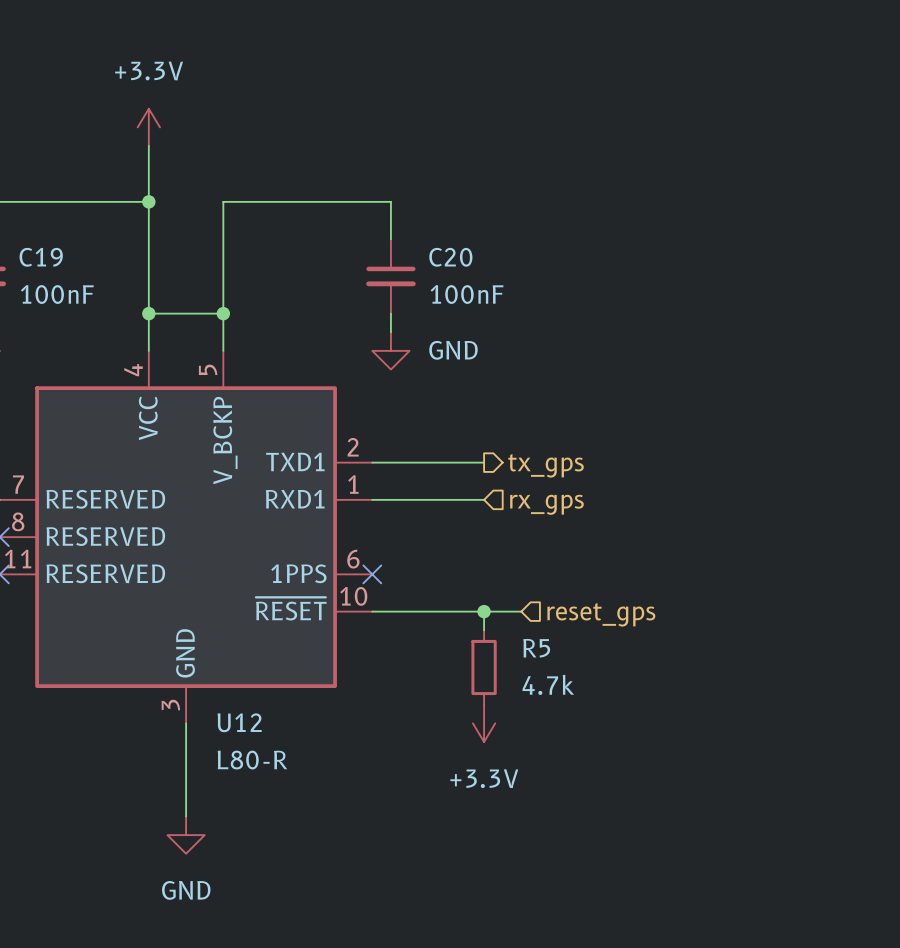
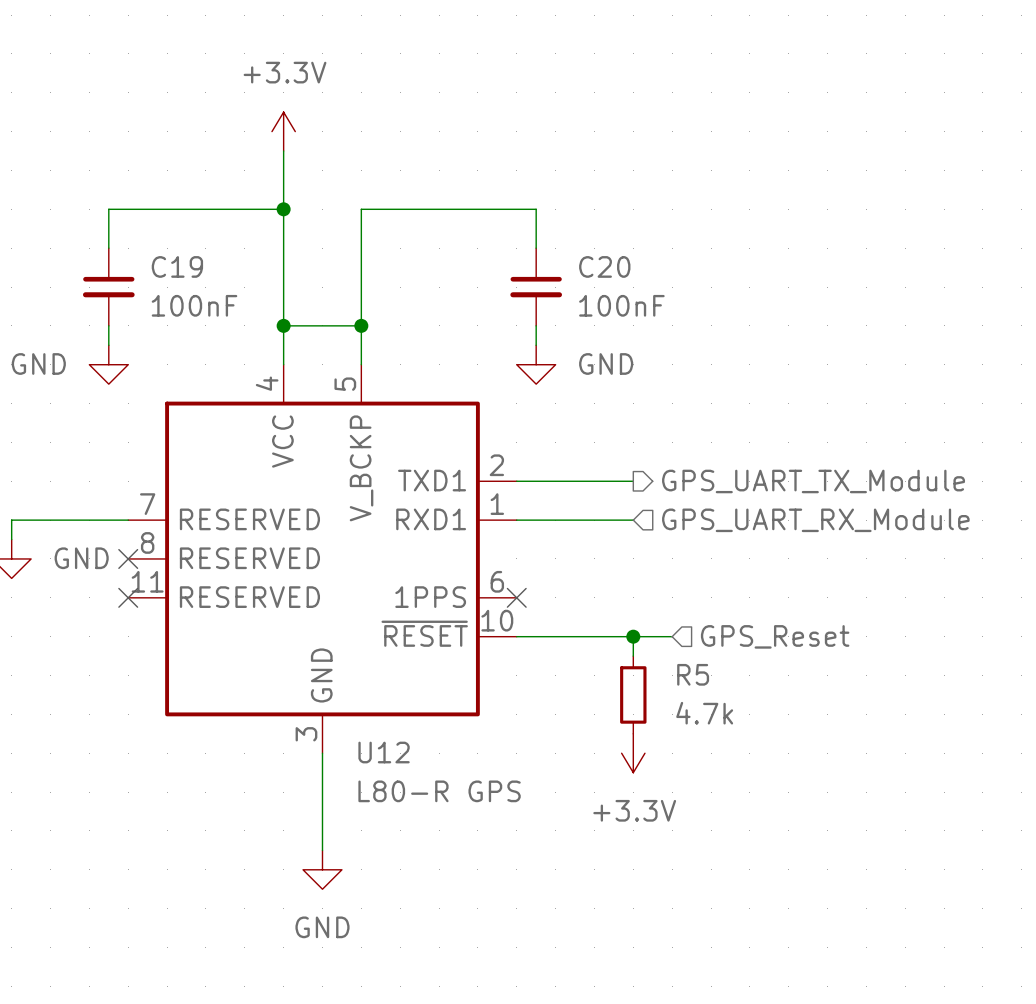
hierarchical label: tx_gps (546, 465) -> GPS_UART_TX_Module (813, 481)
hierarchical label: rx_gps (546, 504) -> GPS_UART_RX_Module (815, 520)
hierarchical label: reset_gps (601, 614) -> GPS_Reset (775, 636)
U12 value: L80-R (252, 760) -> L80-R GPS (439, 791)

